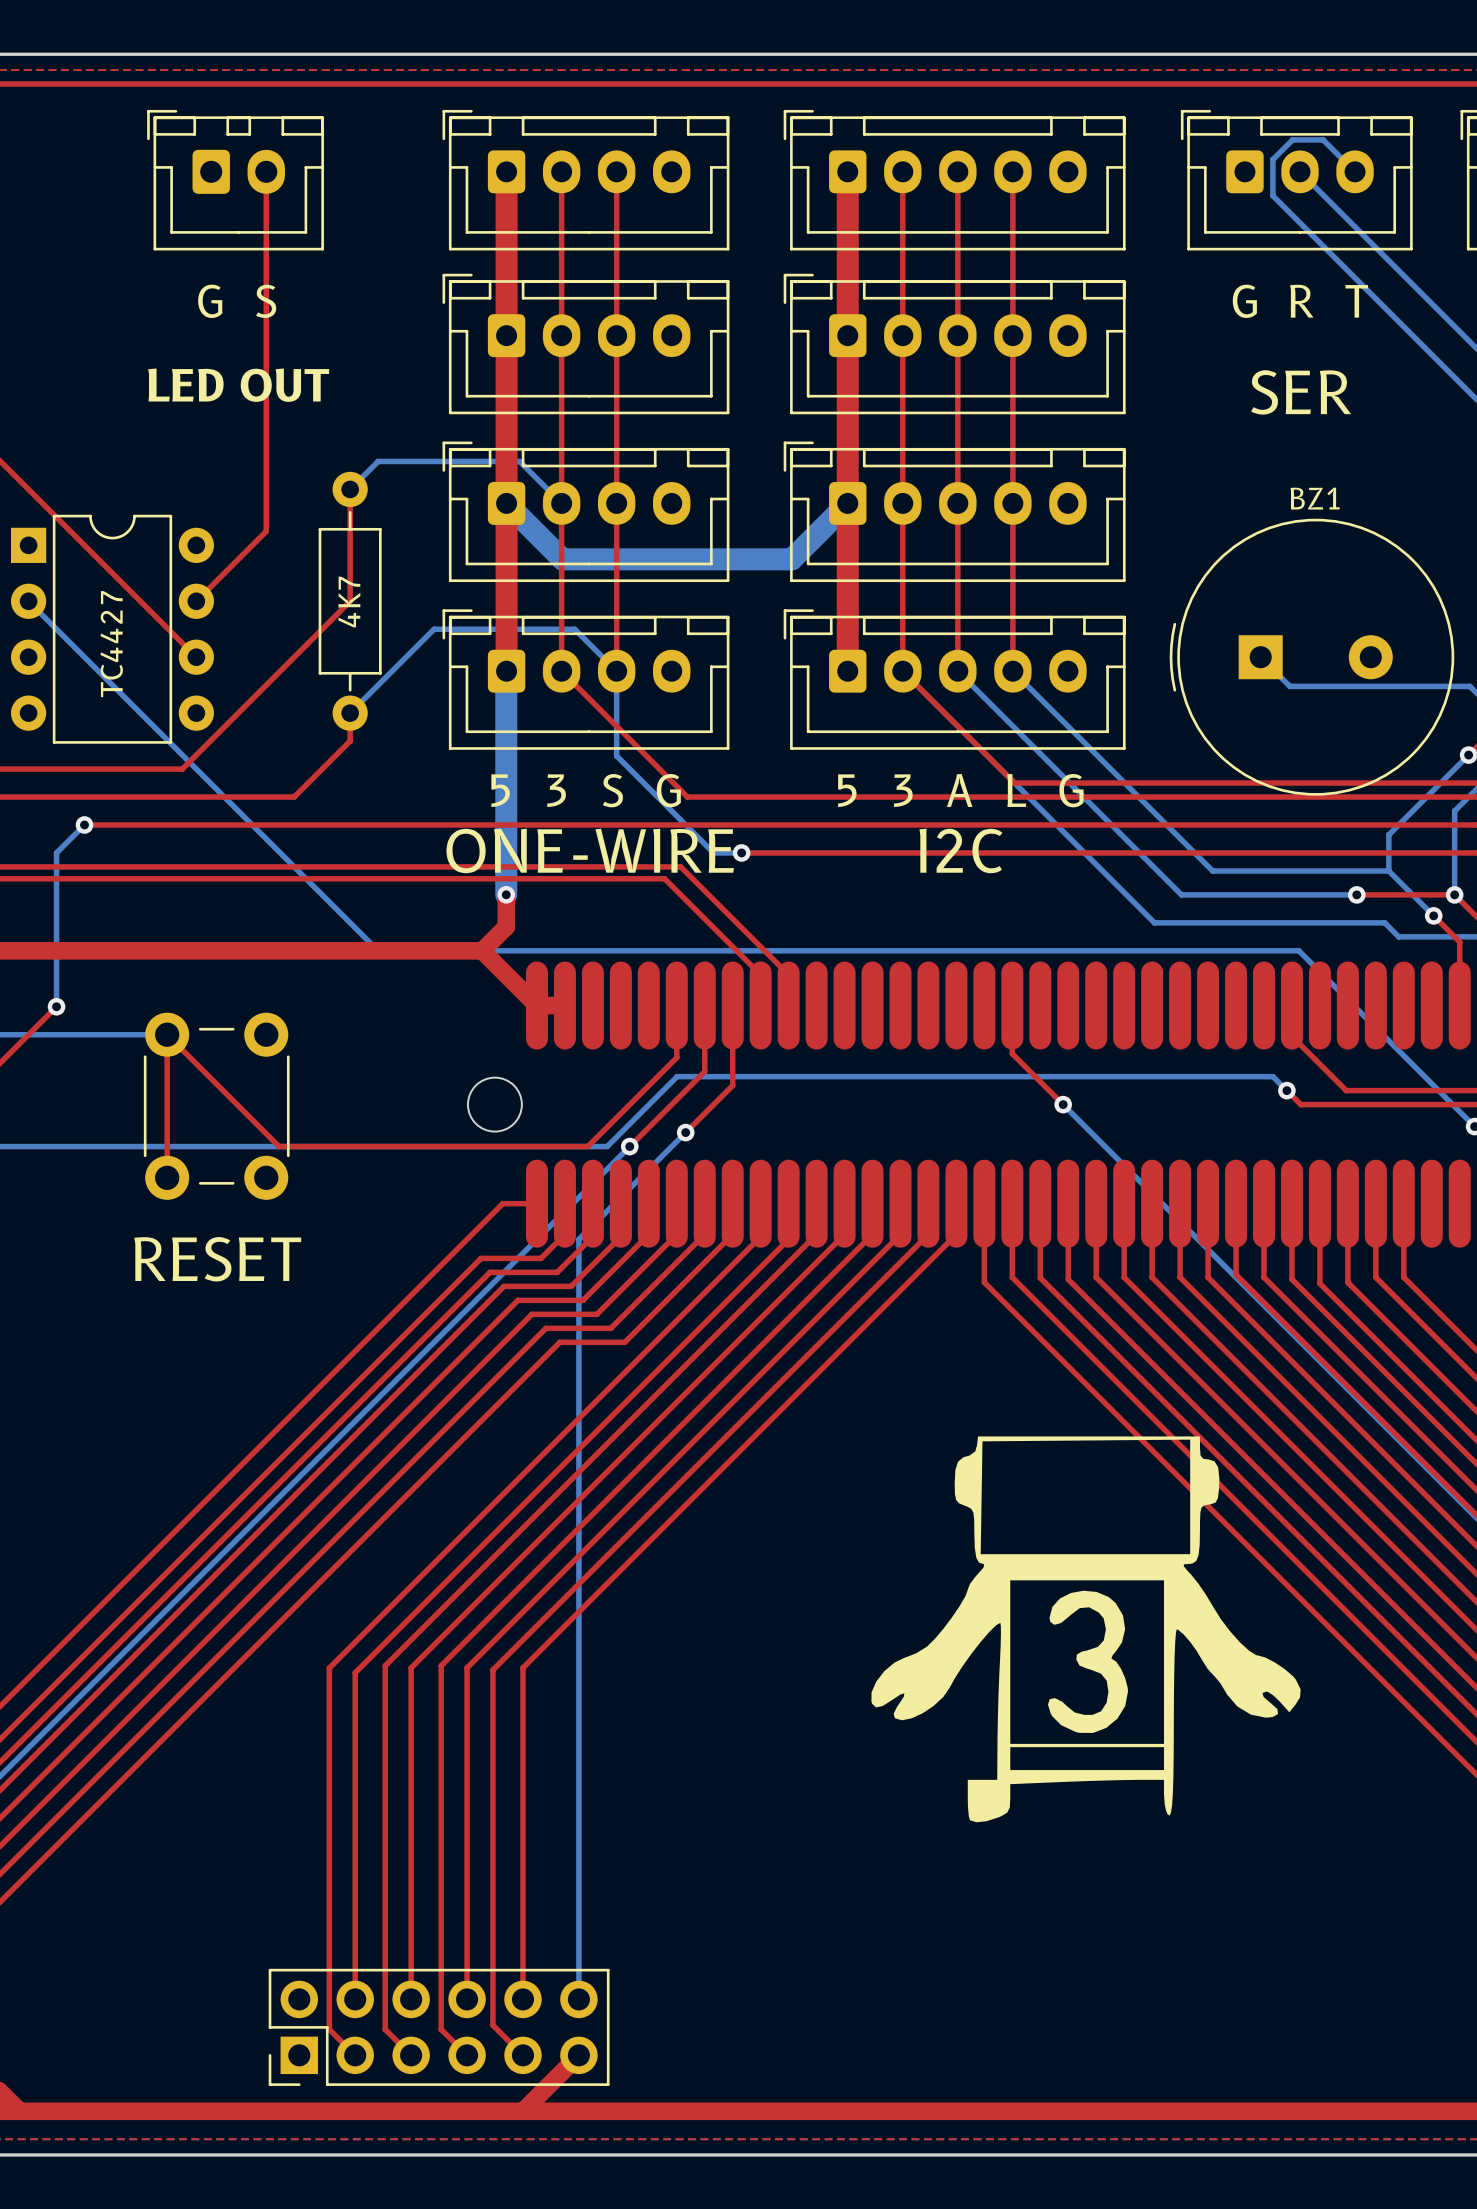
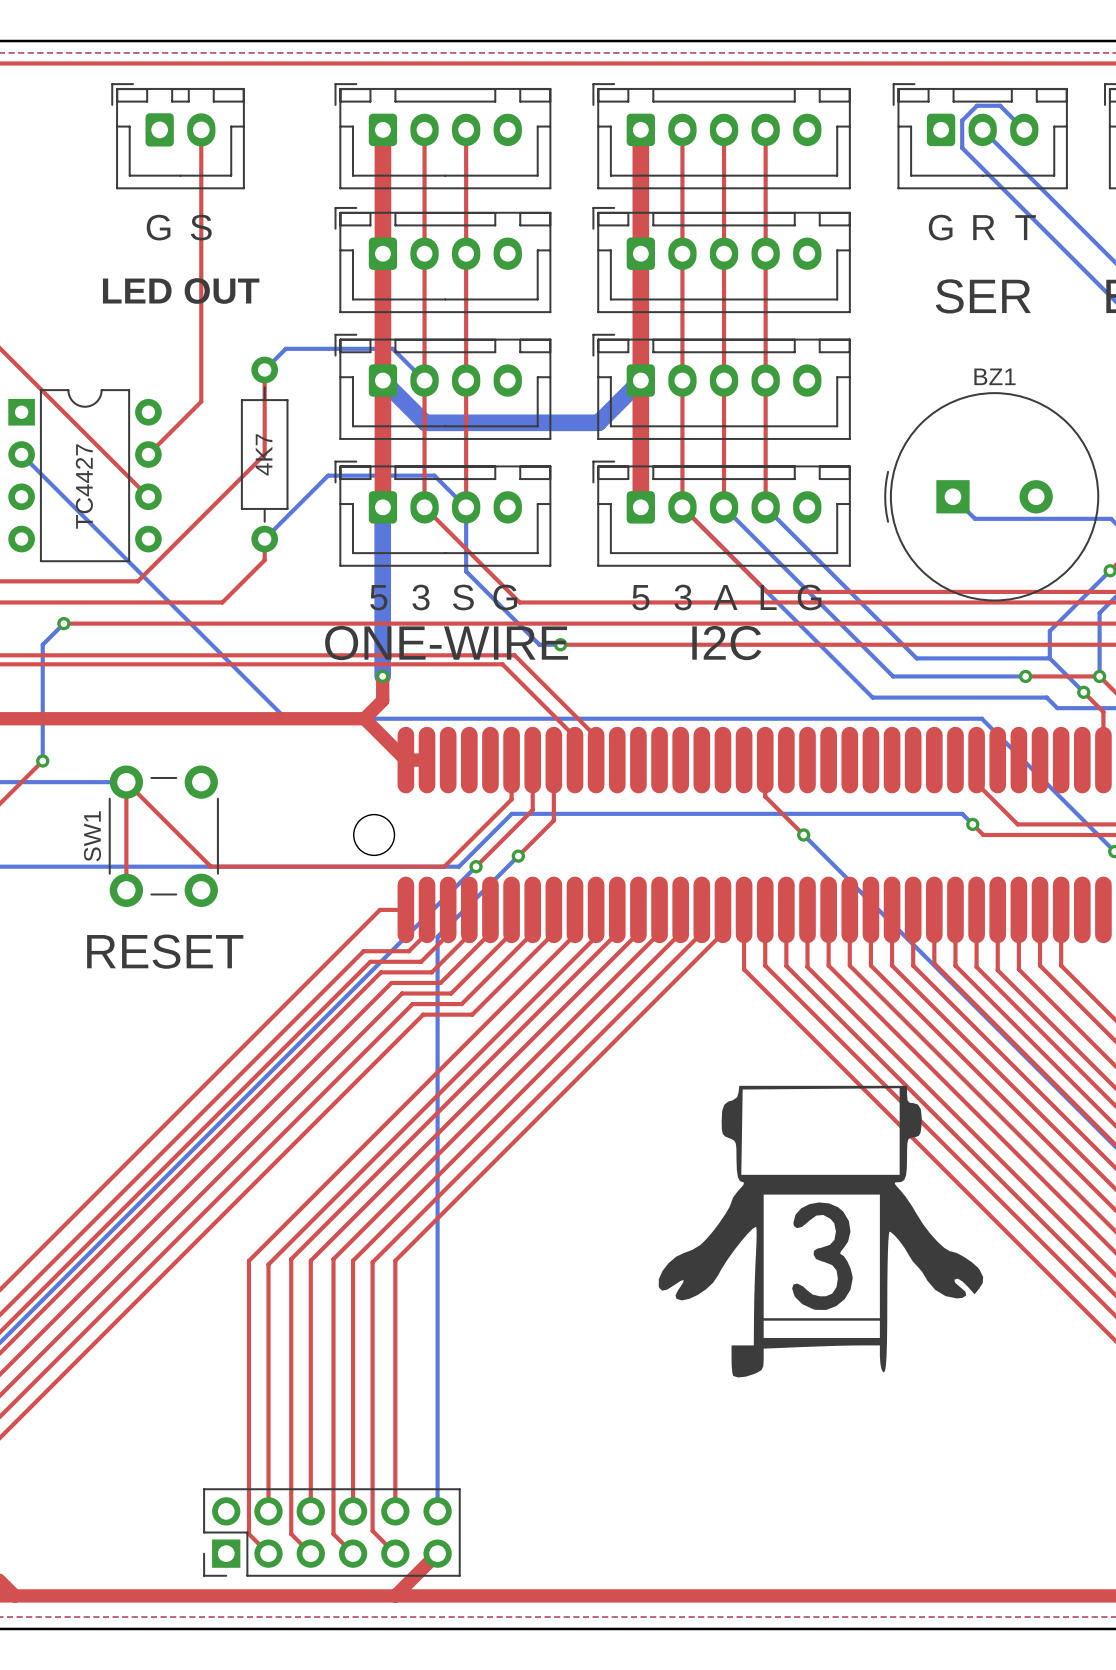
SW1 name: none -> SW1 (92, 836)

